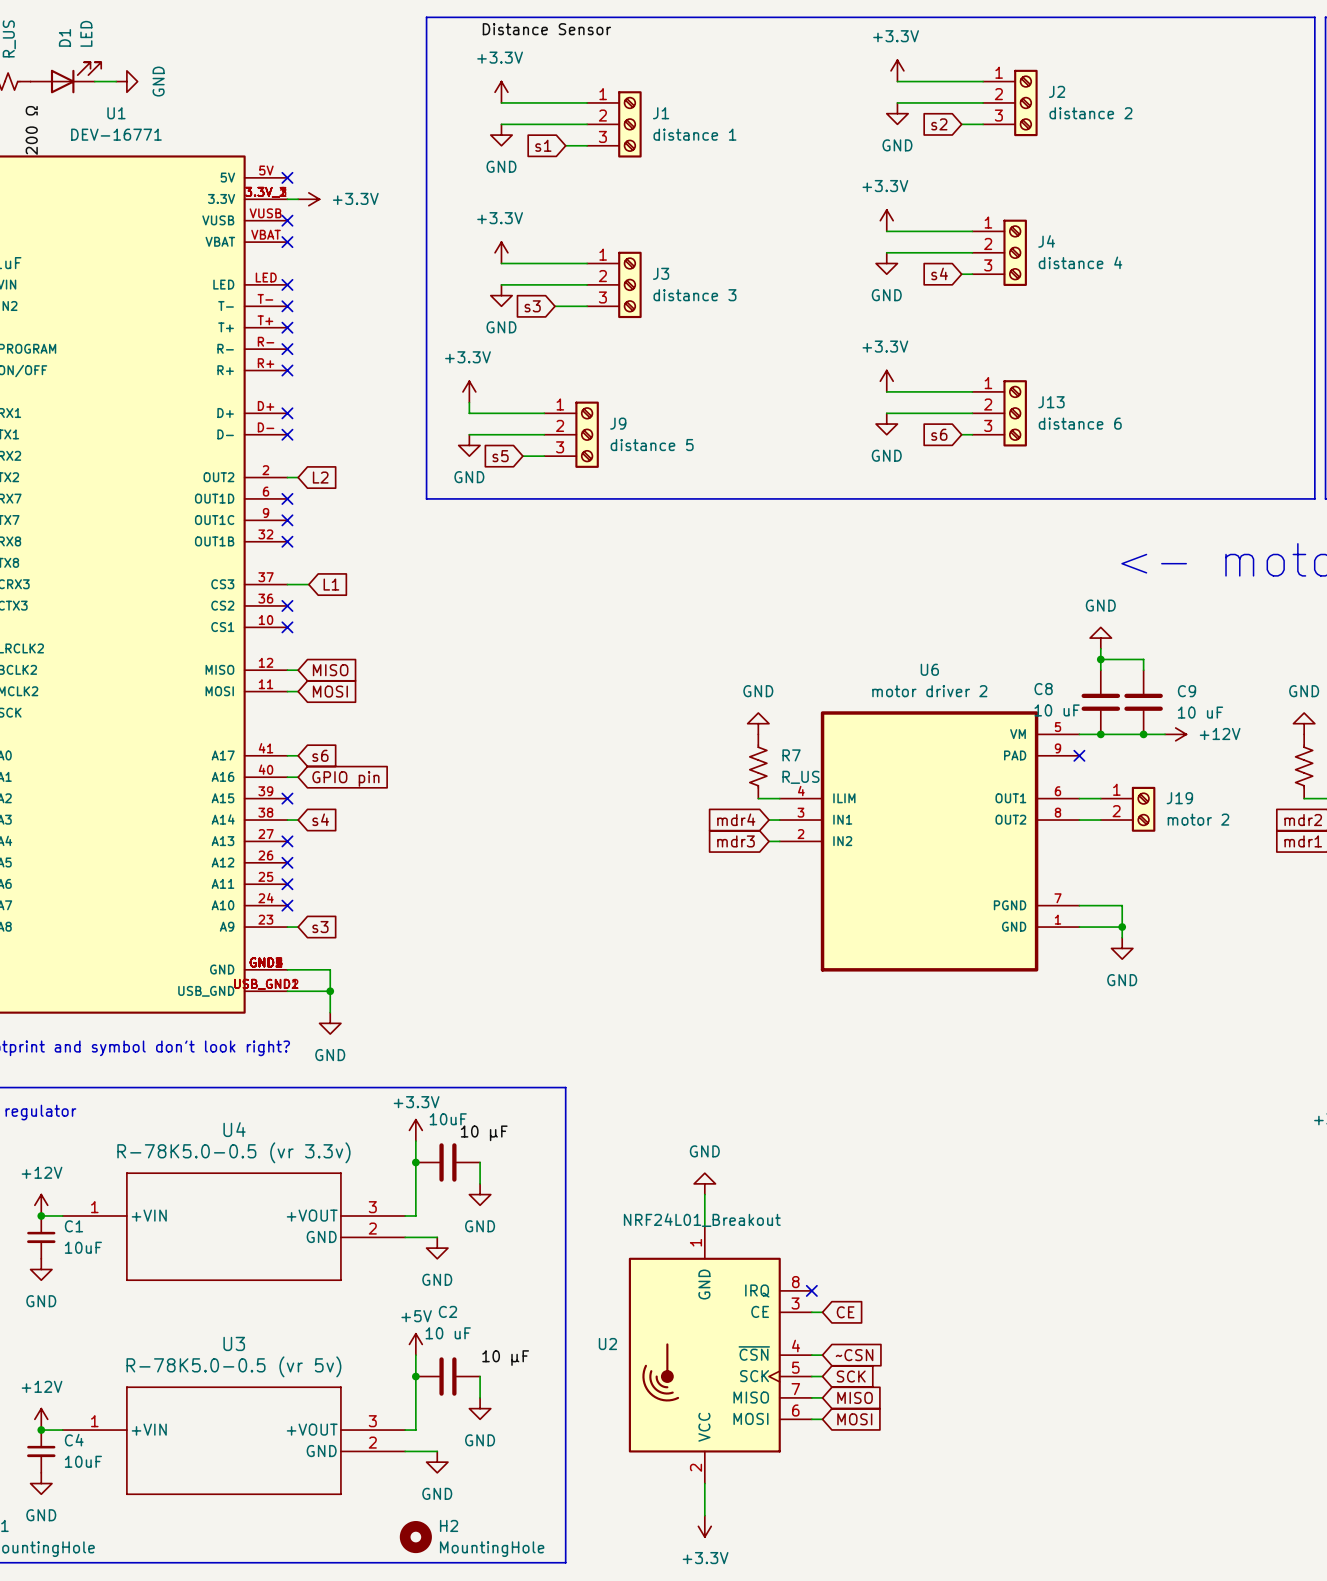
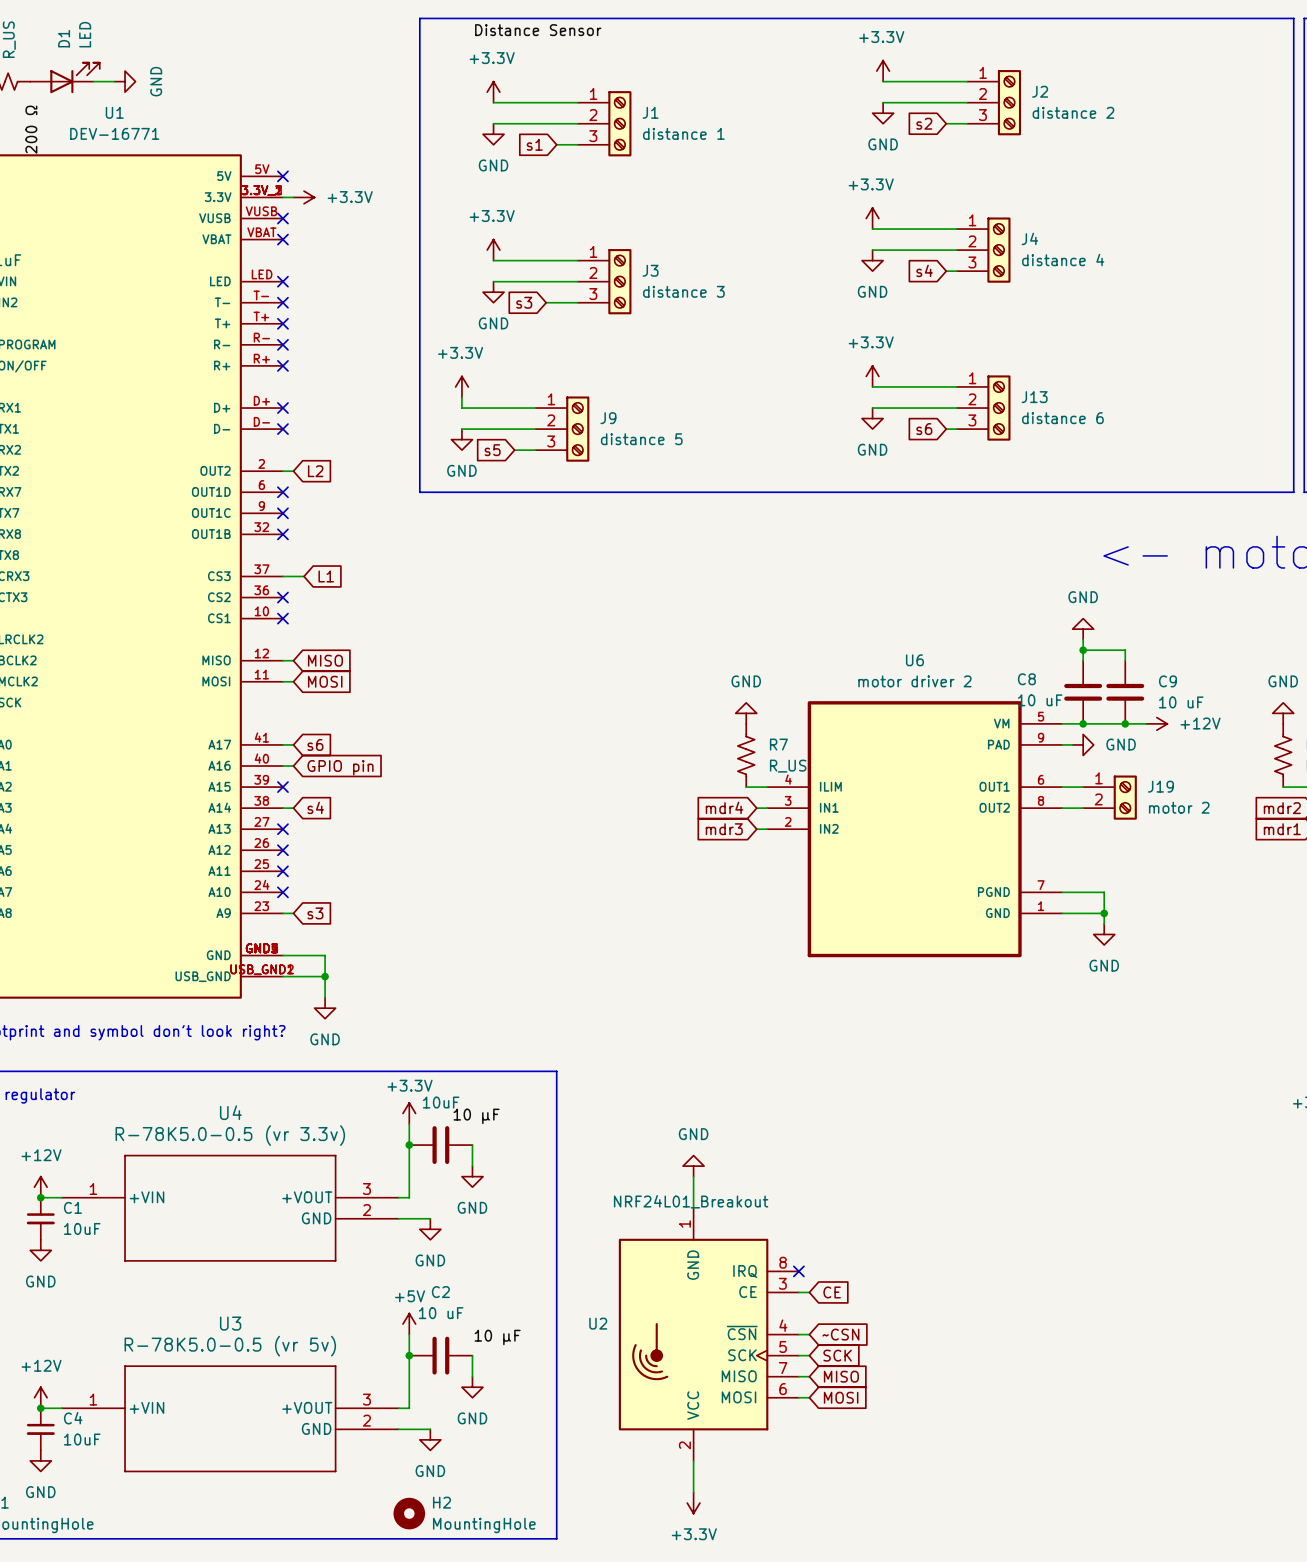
wire: none -> (1062, 744) (1072, 744)
no-connect mark: (1079, 755) -> none
power symbol: none -> GND (1083, 744)

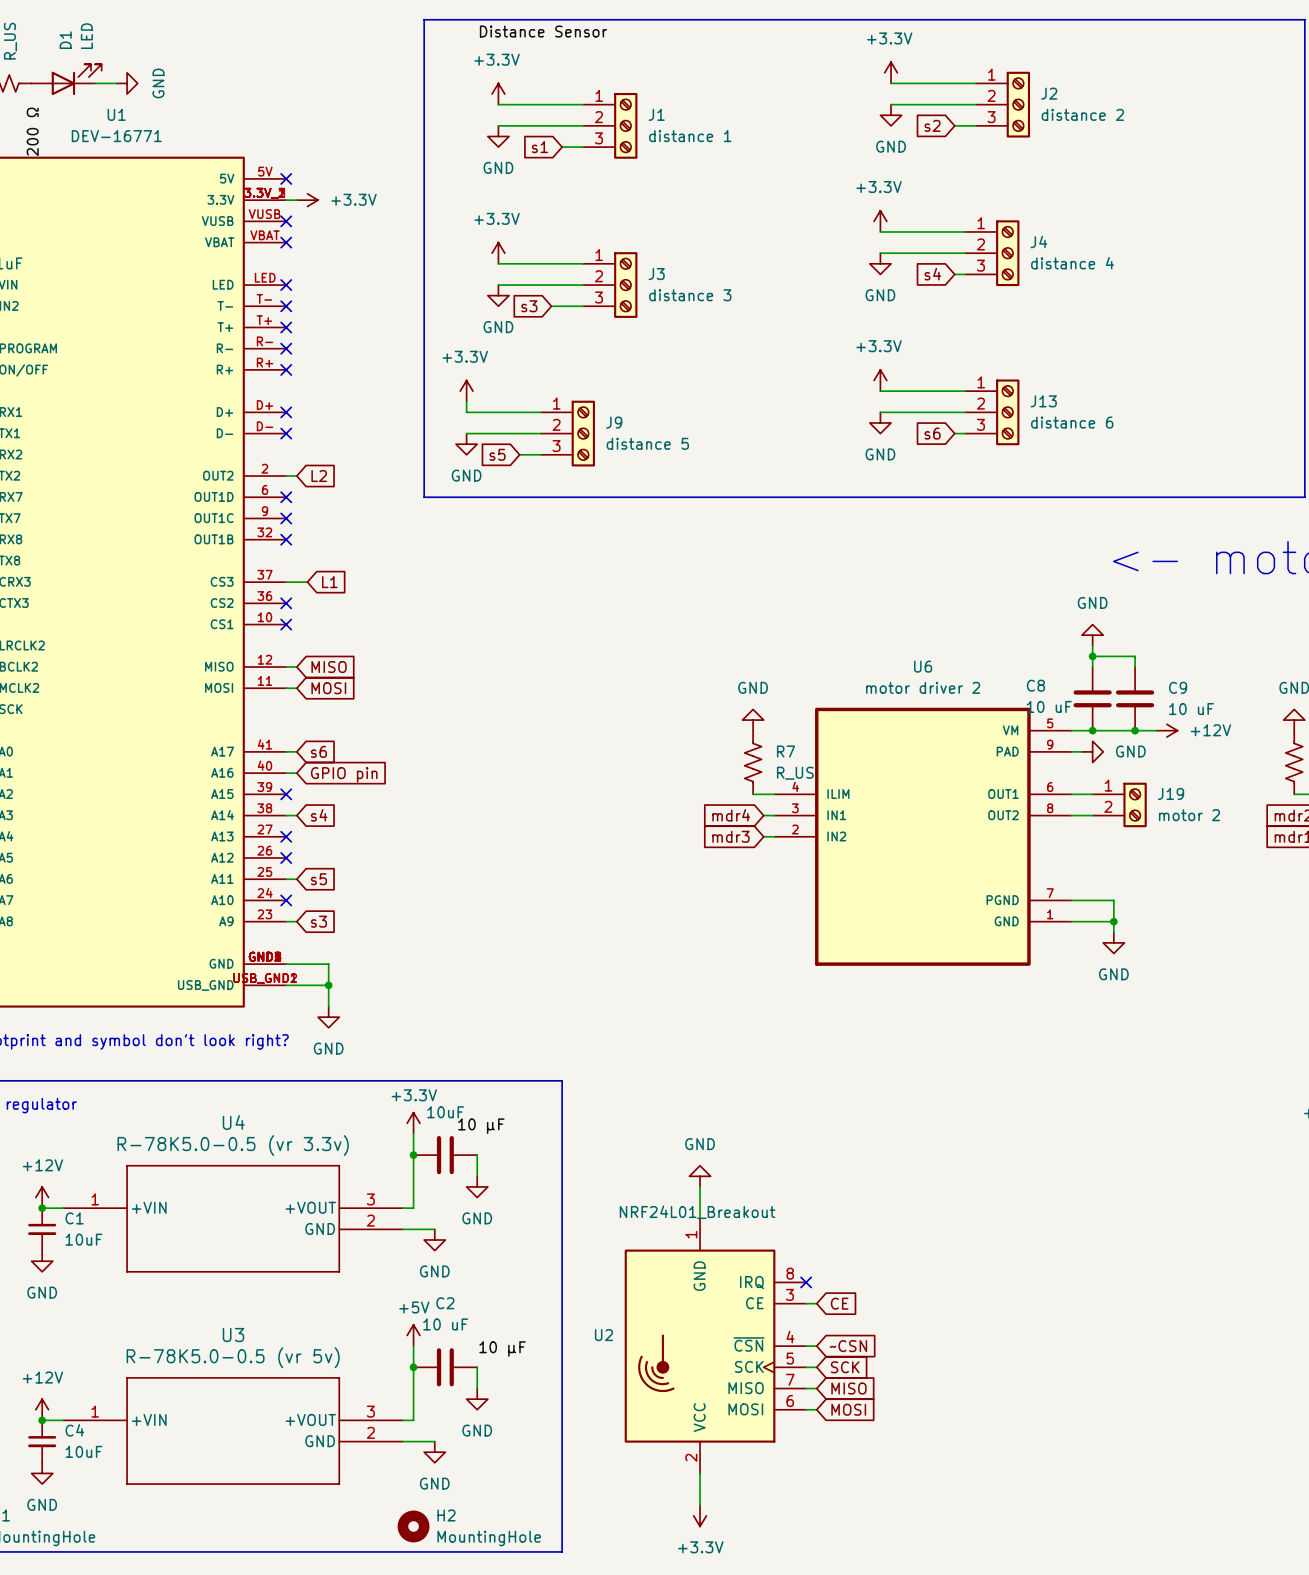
wire: none -> (286, 879) (296, 879)
no-connect mark: (282, 871) -> none
global label: none -> s5 (318, 879)

